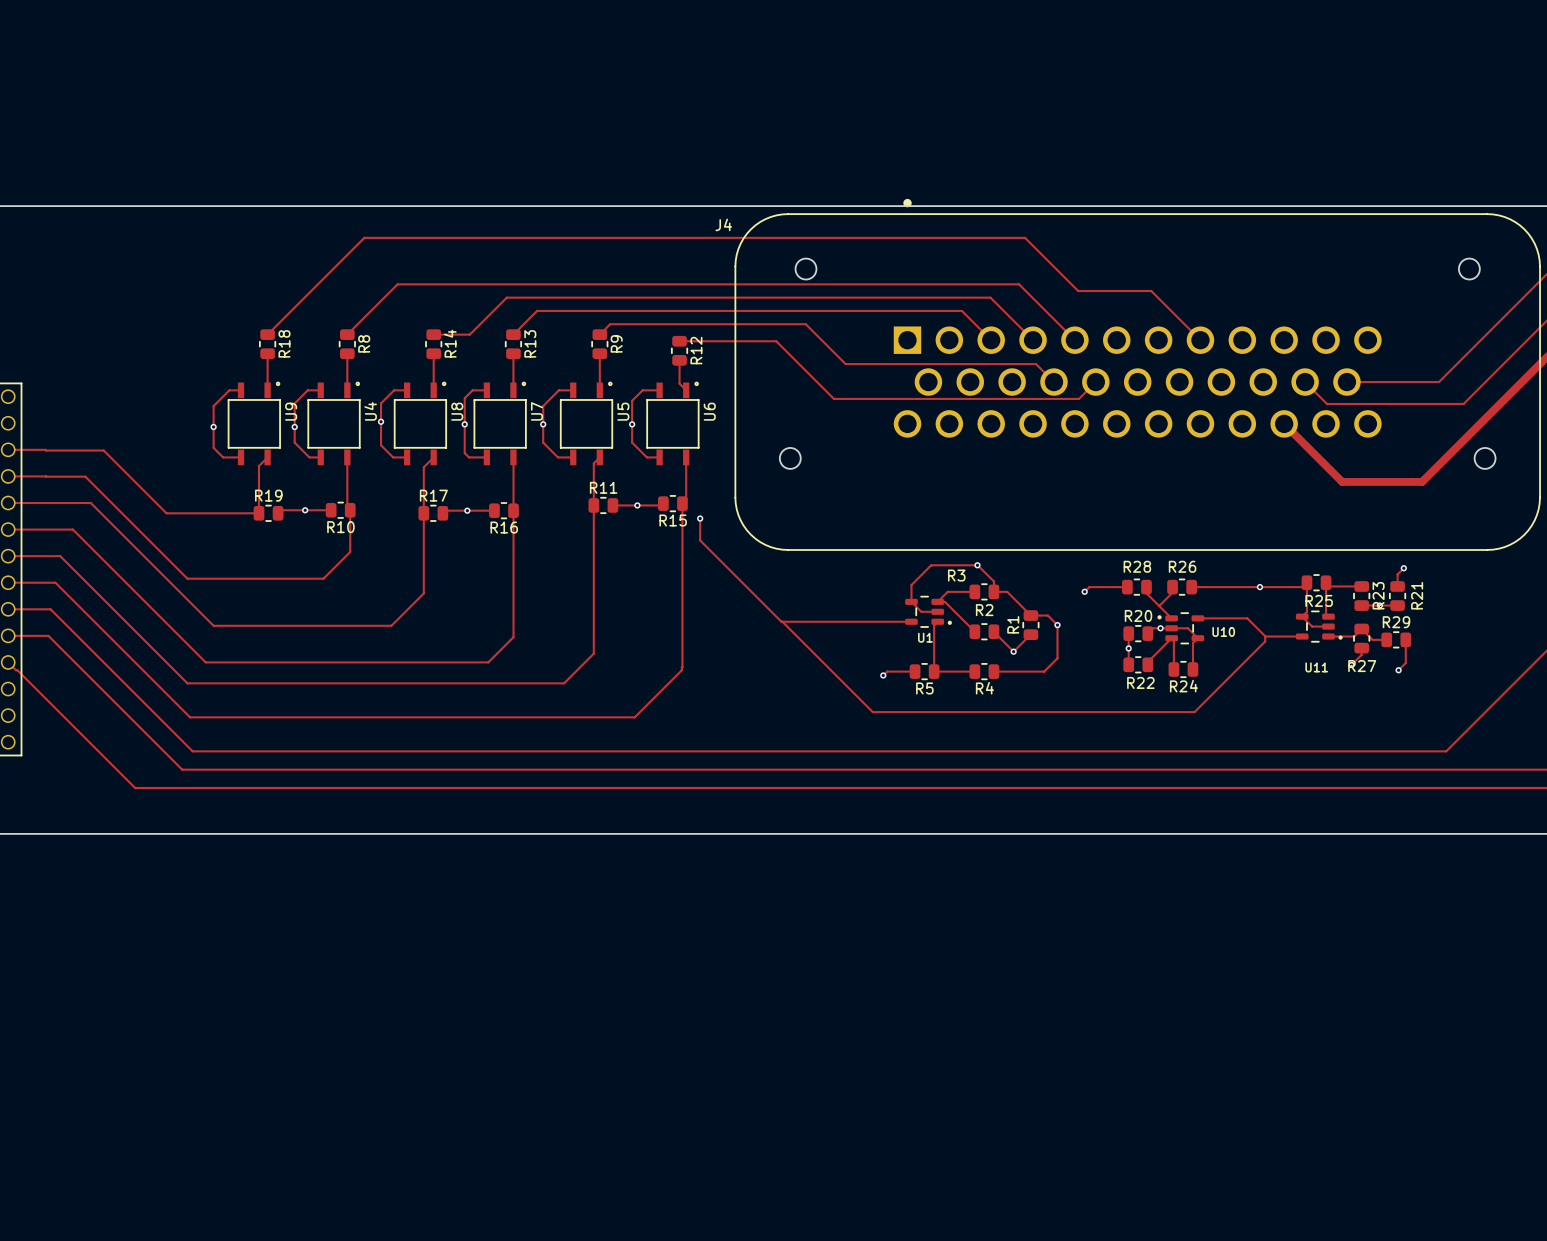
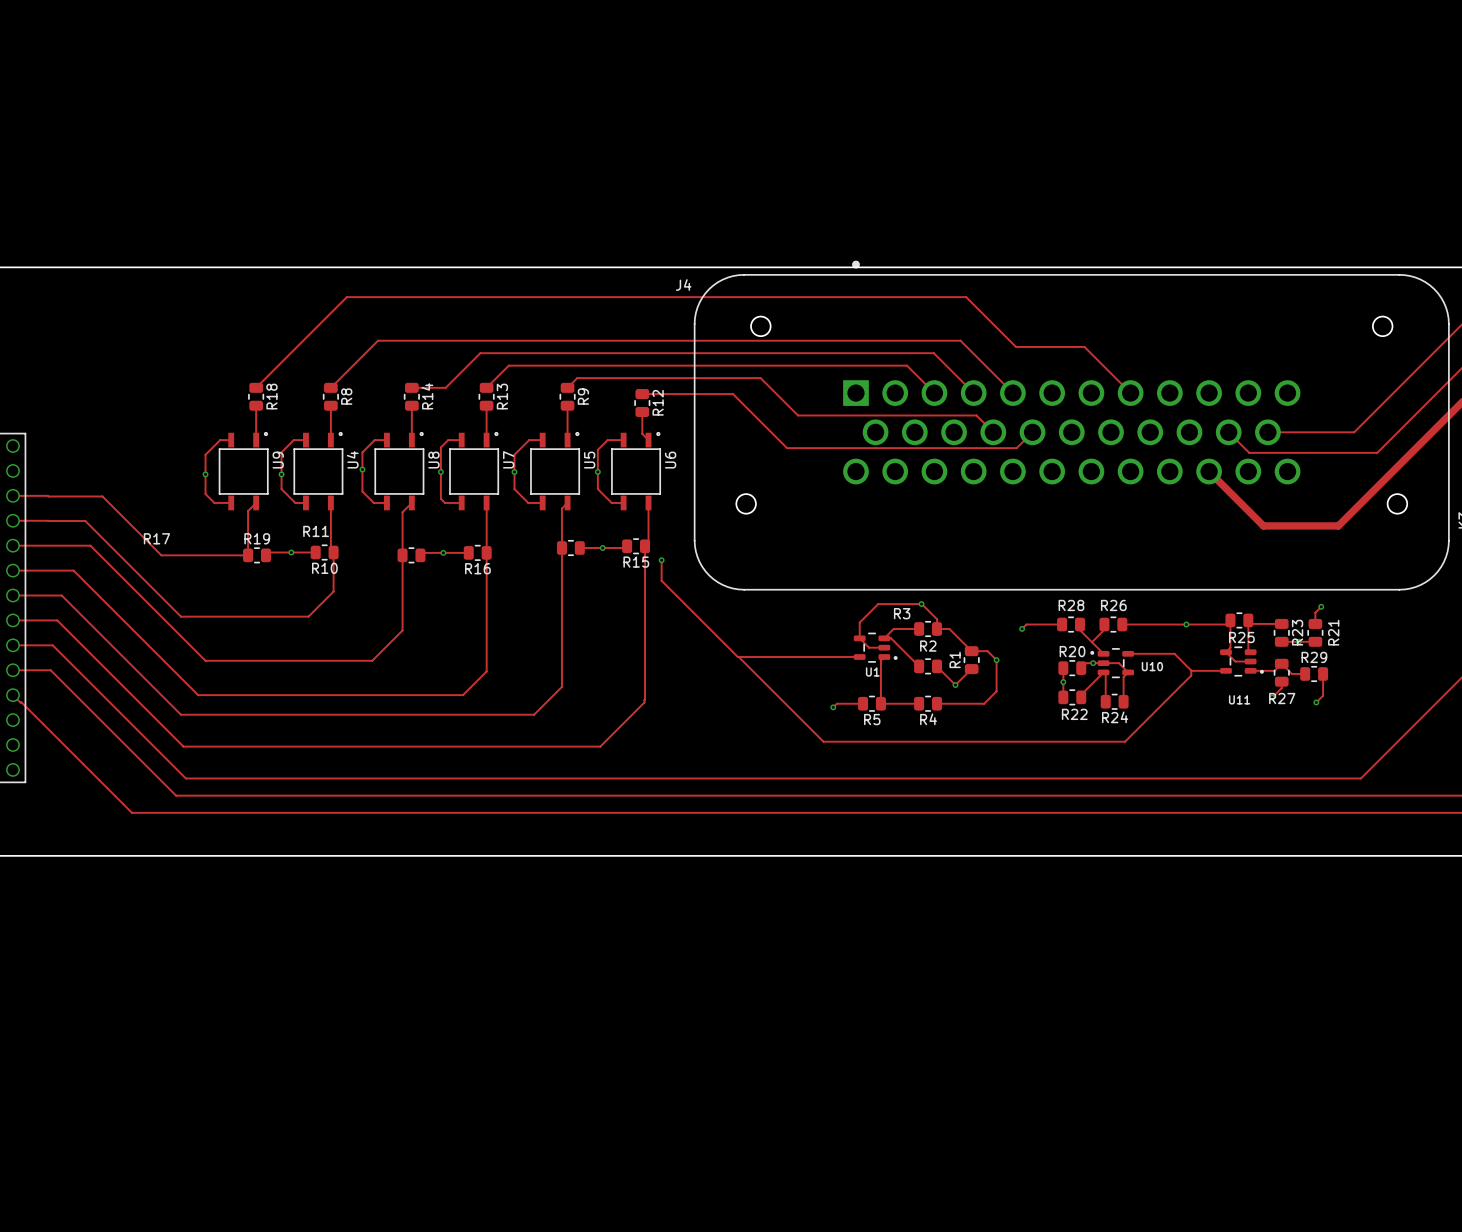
R11 name position: R11 (603, 487) -> R11 (316, 531)
R17 name position: R17 (433, 495) -> R17 (156, 538)

